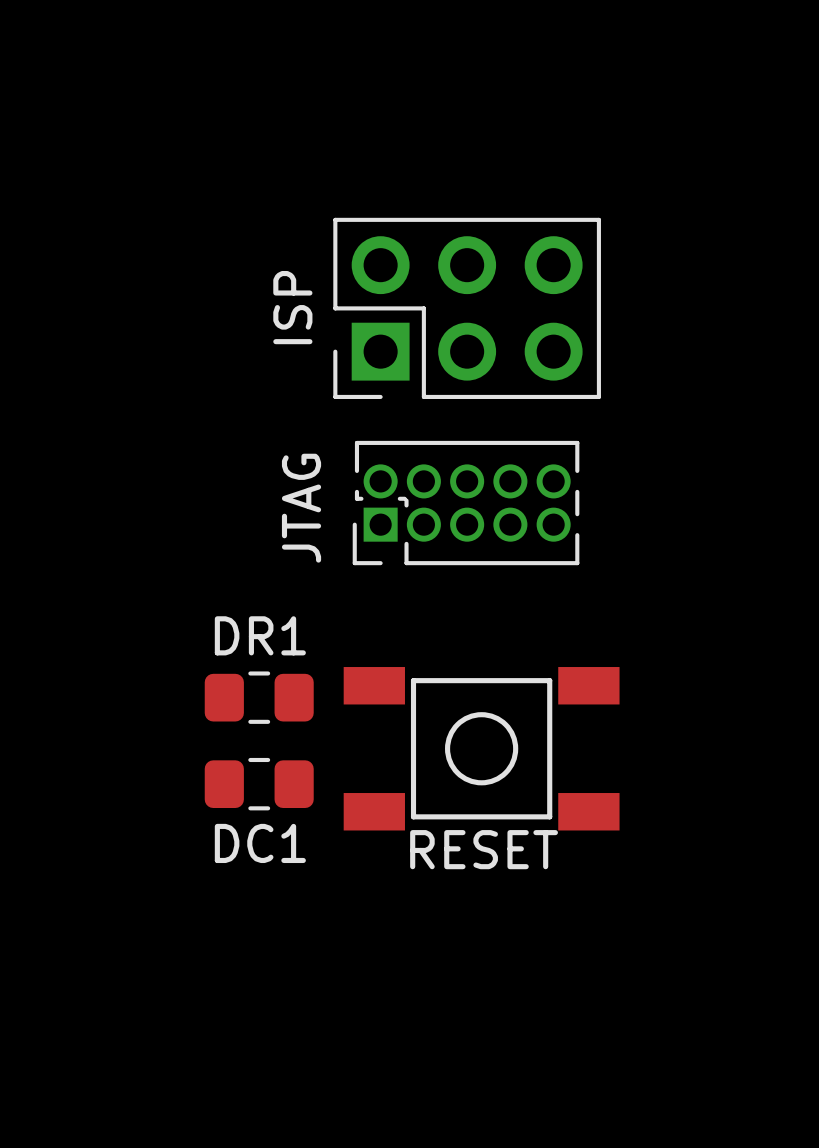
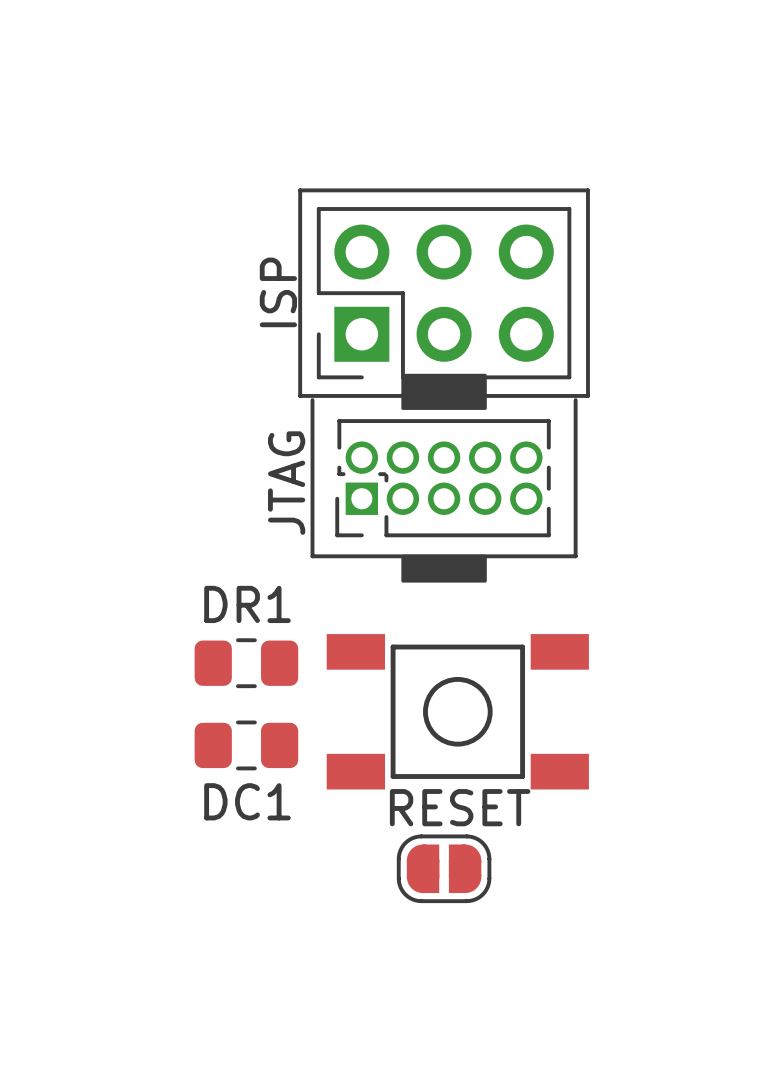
line: none -> (300, 190) (300, 395) (587, 395) (587, 190) (300, 190)
drawing: none -> [401, 373, 487, 410]
line: none -> (312, 400) (312, 556) (575, 556) (575, 400)
drawing: none -> [401, 554, 487, 583]
part: none -> (444, 868)

